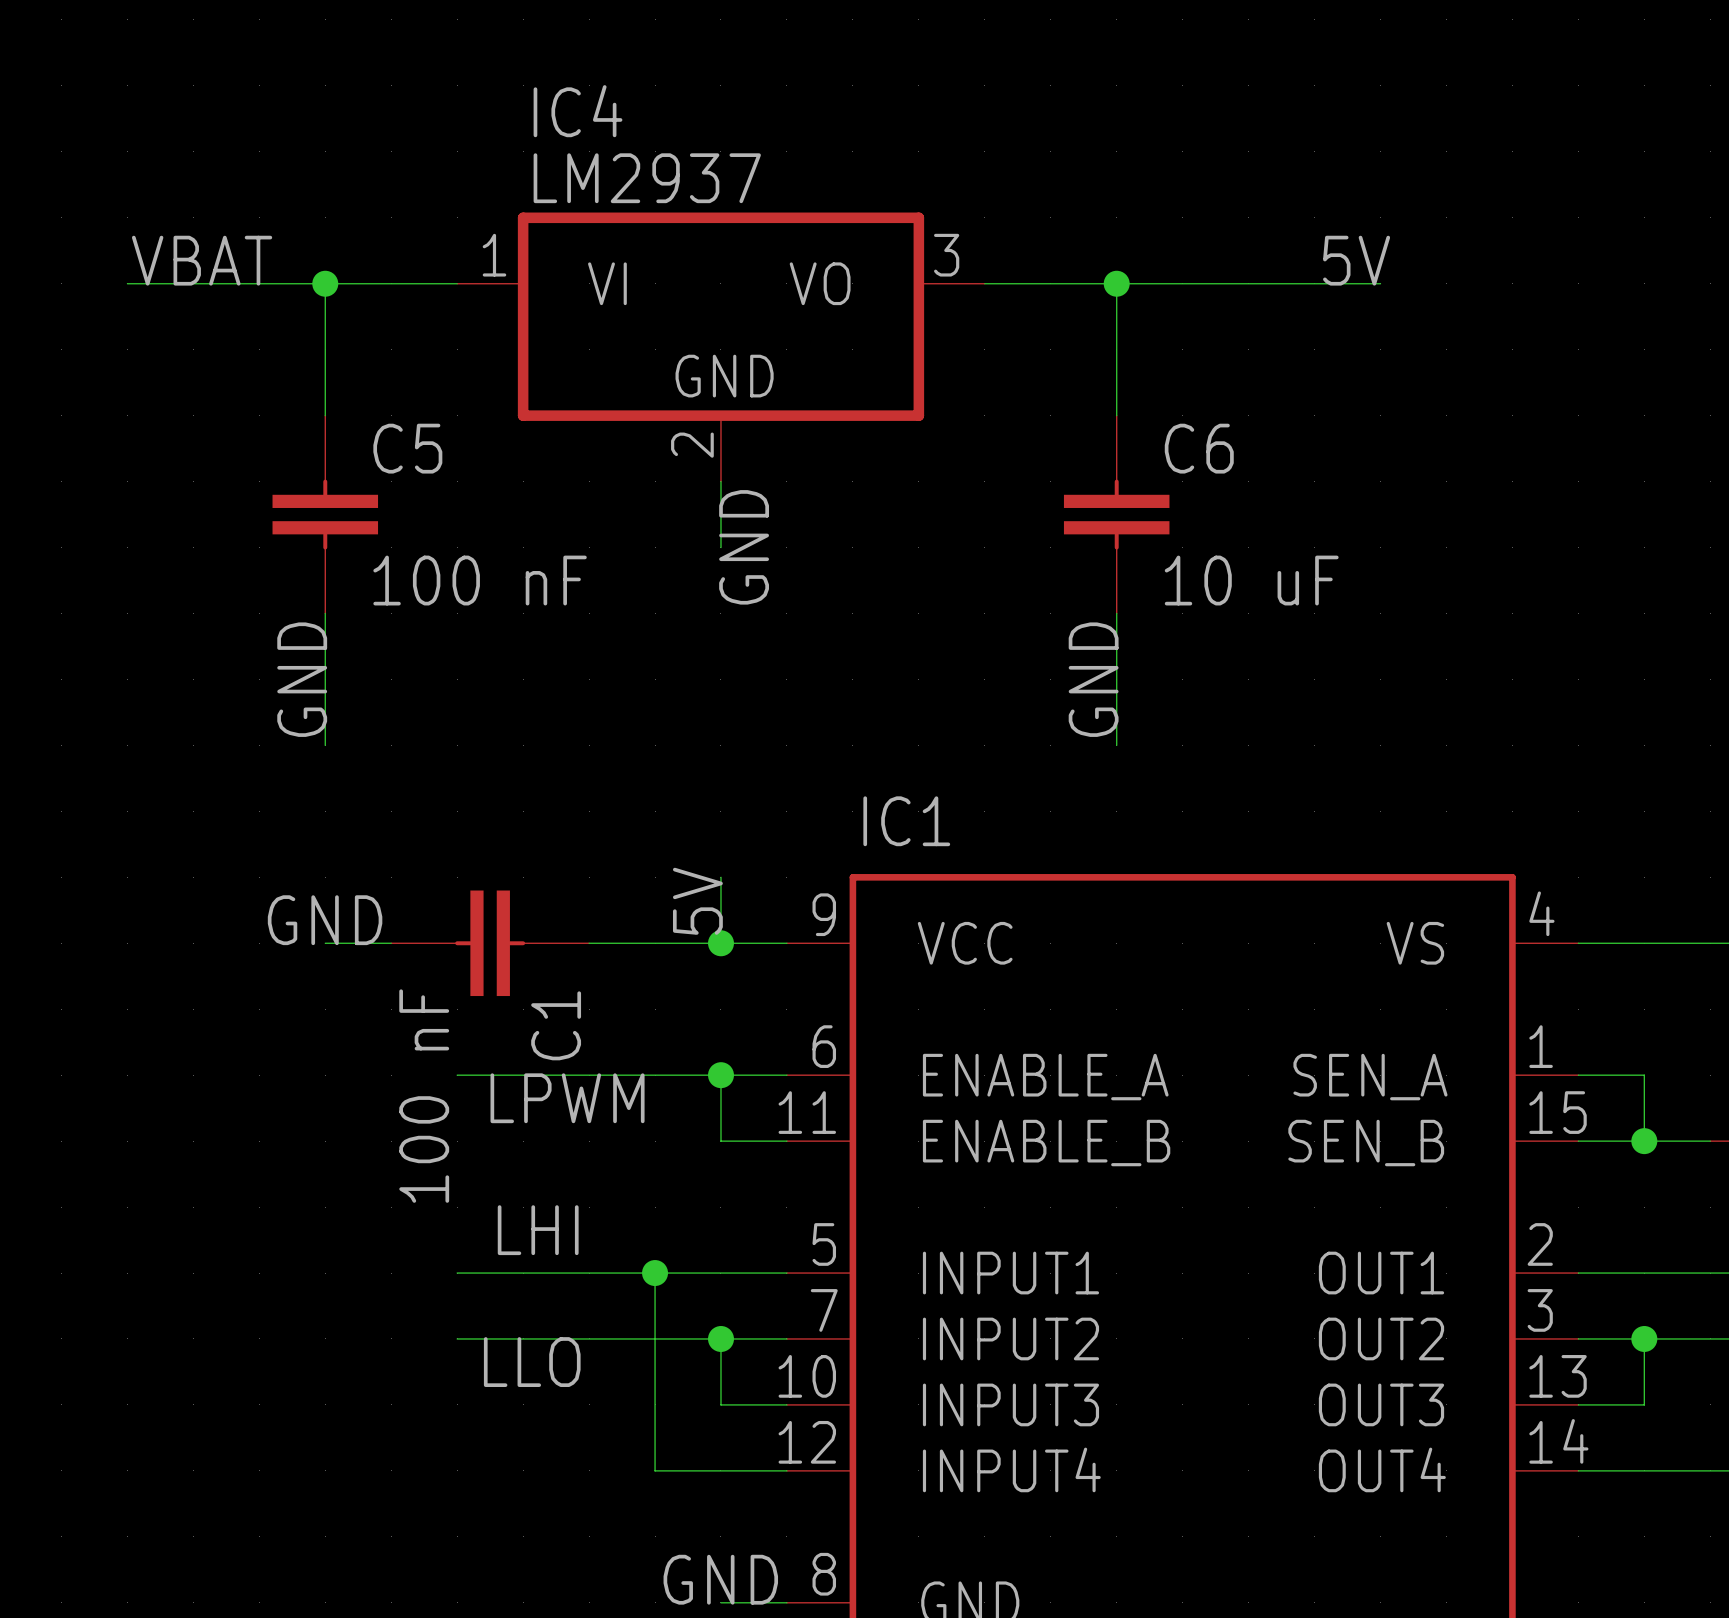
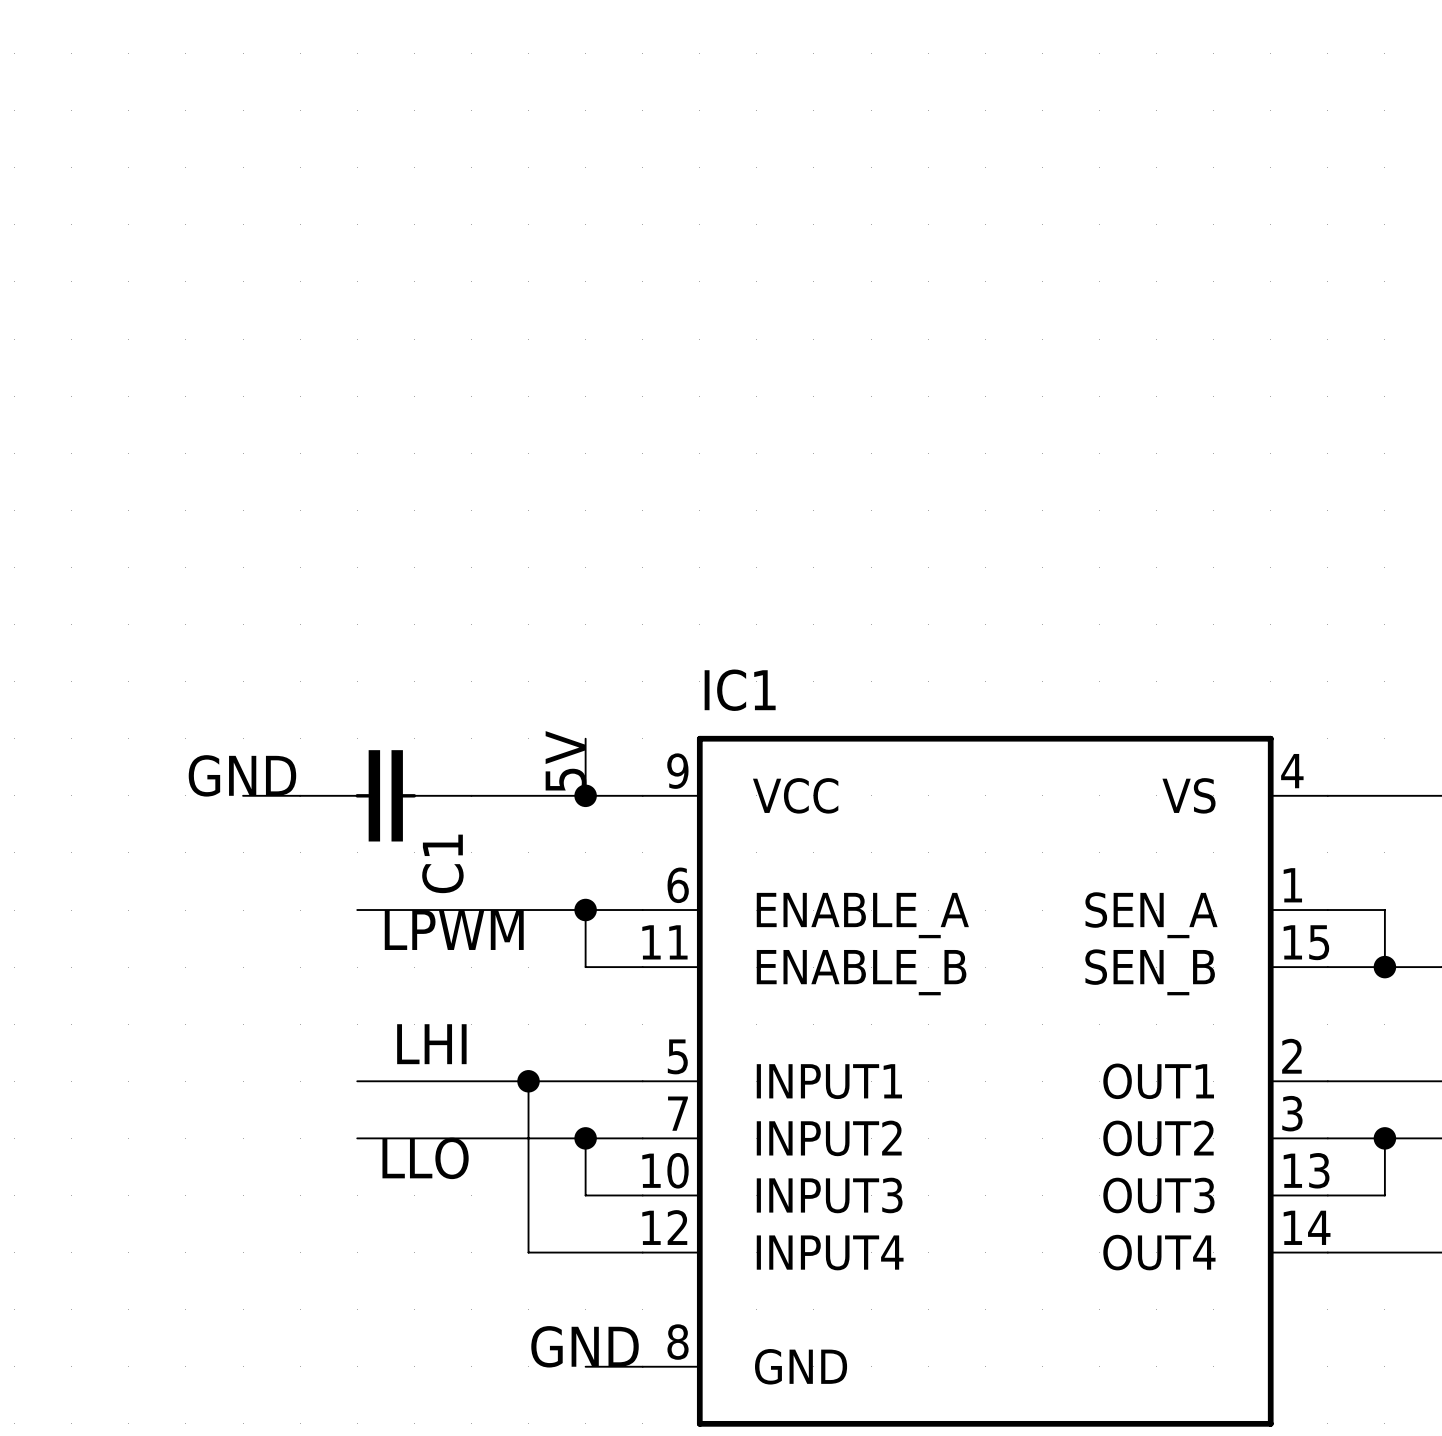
label: VBAT (202, 260) -> none
label: 5V (1356, 260) -> none
wire: (127, 283) (457, 283) -> none
wire: (325, 283) (325, 415) -> none
junction: (325, 283) -> none
wire: (984, 283) (1380, 283) -> none
wire: (1116, 283) (1116, 415) -> none
junction: (1116, 283) -> none
IC4: LM2937 (720, 347) -> none
wire: (720, 481) (720, 547) -> none
C5: 100 nF (325, 514) -> none
C6: 10 uF (1116, 514) -> none
label: GND (744, 547) -> none
wire: (325, 613) (325, 745) -> none
wire: (1116, 613) (1116, 745) -> none
label: GND (302, 679) -> none
label: GND (1093, 679) -> none
C1 value: 100 nF (424, 1096) -> none

